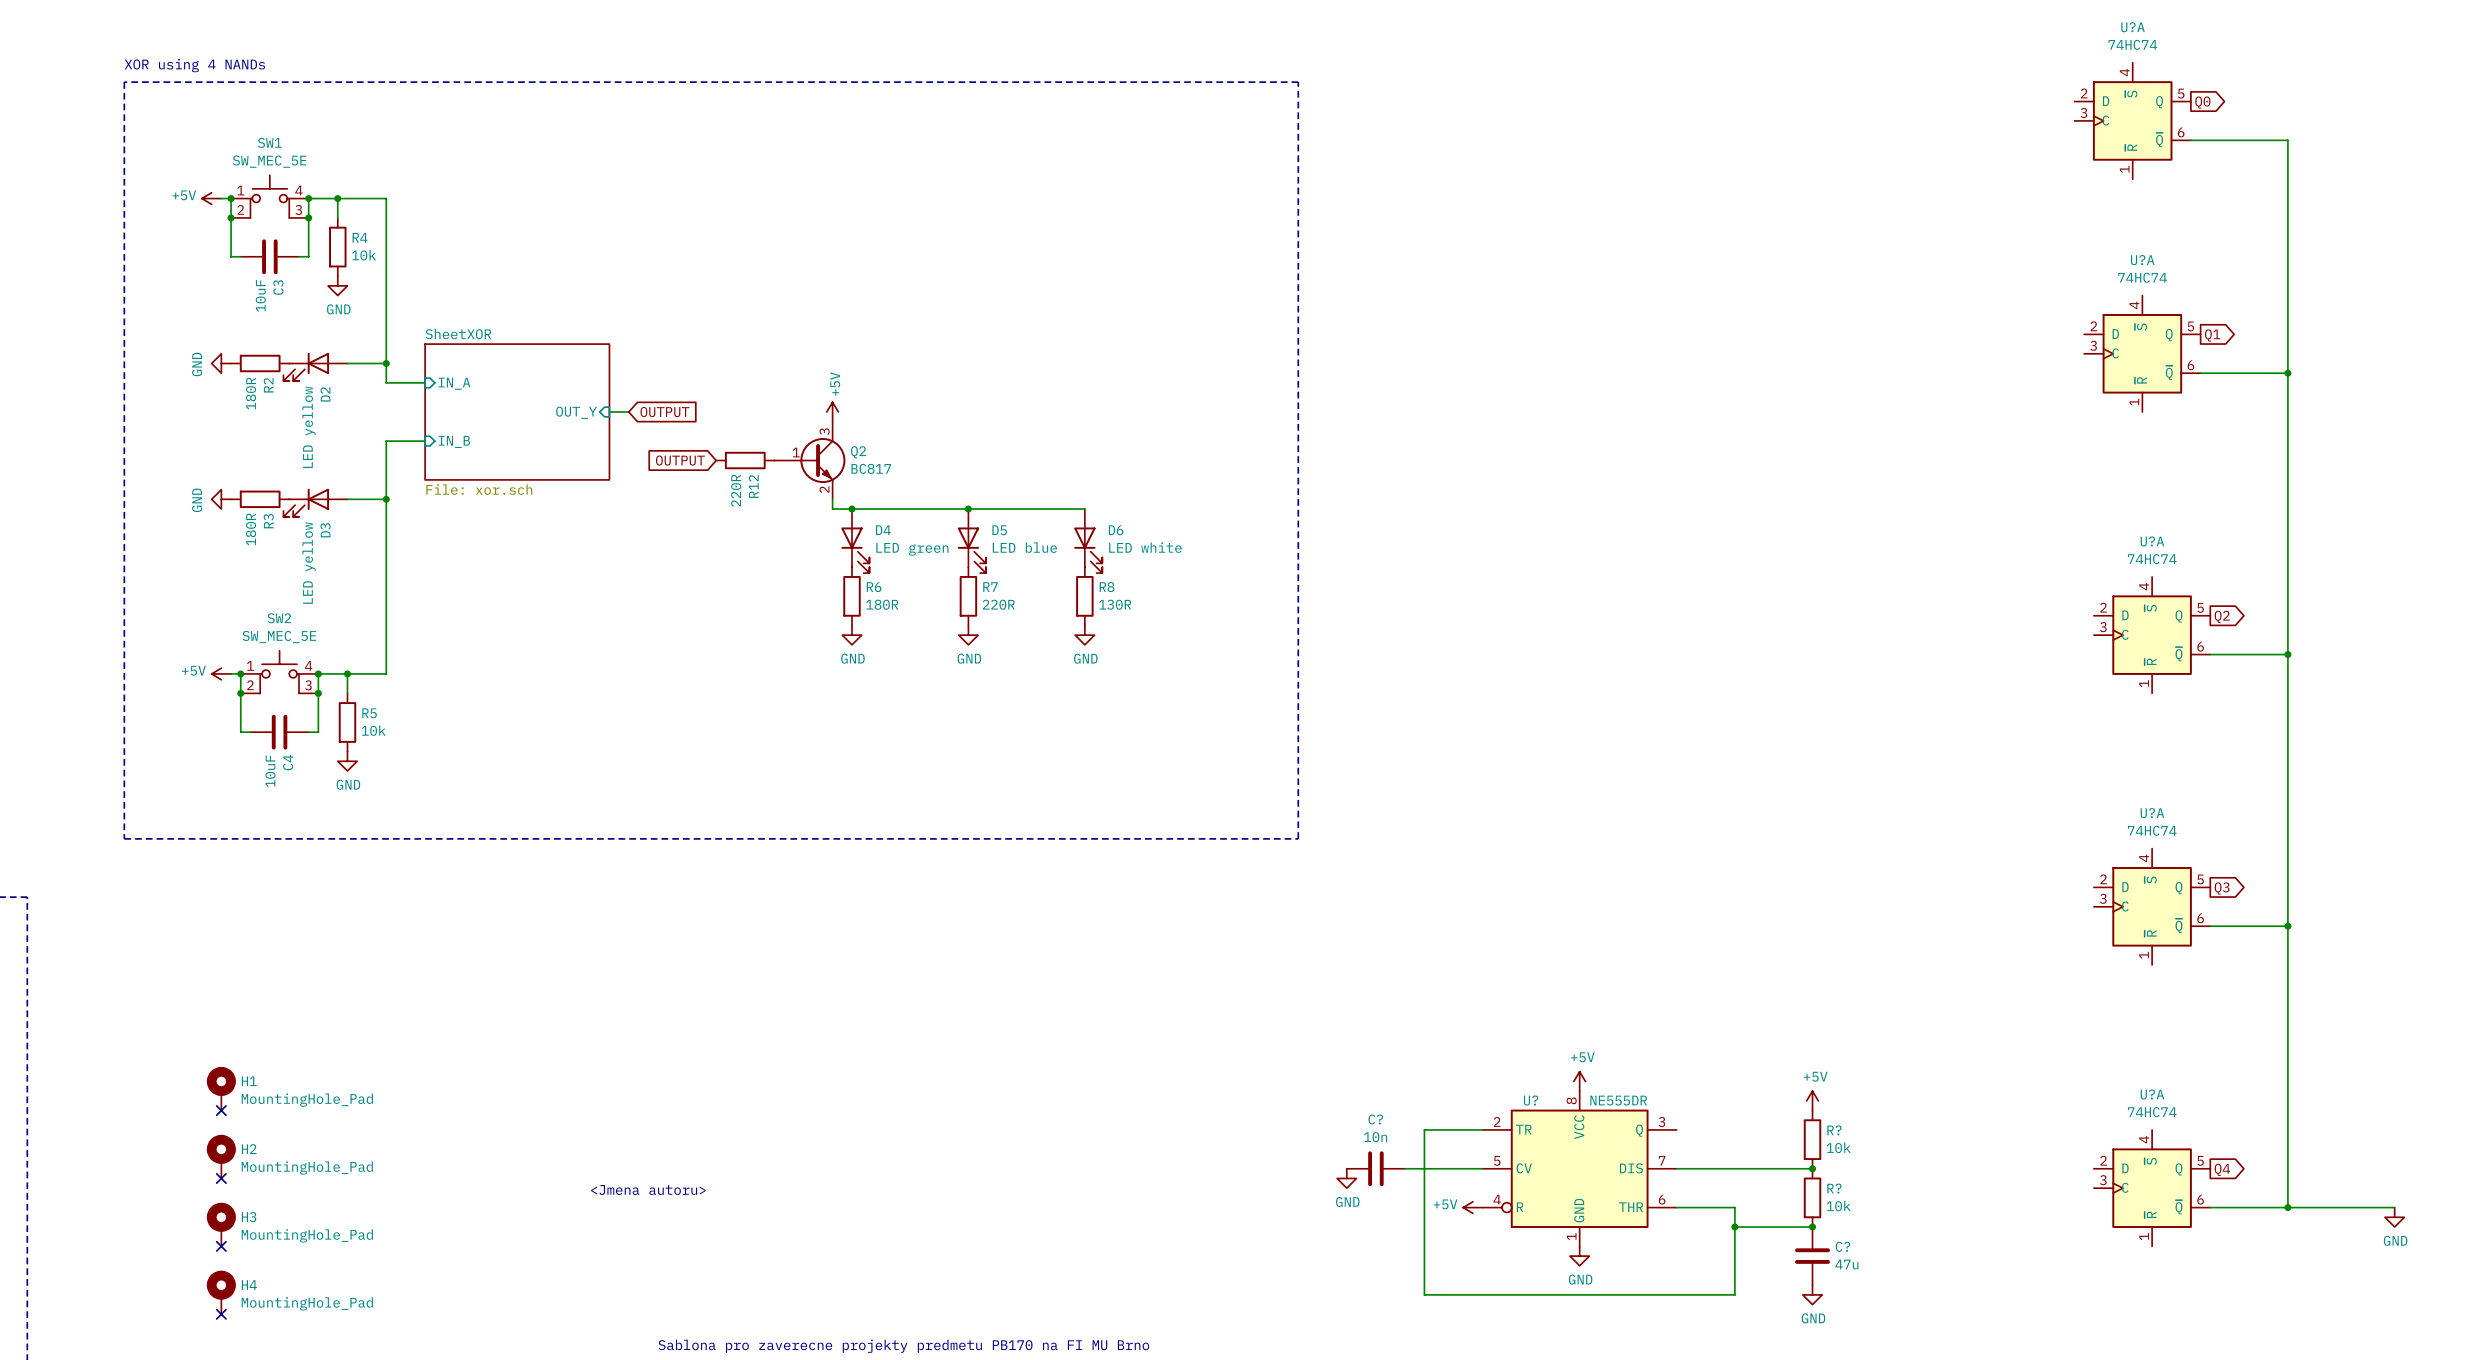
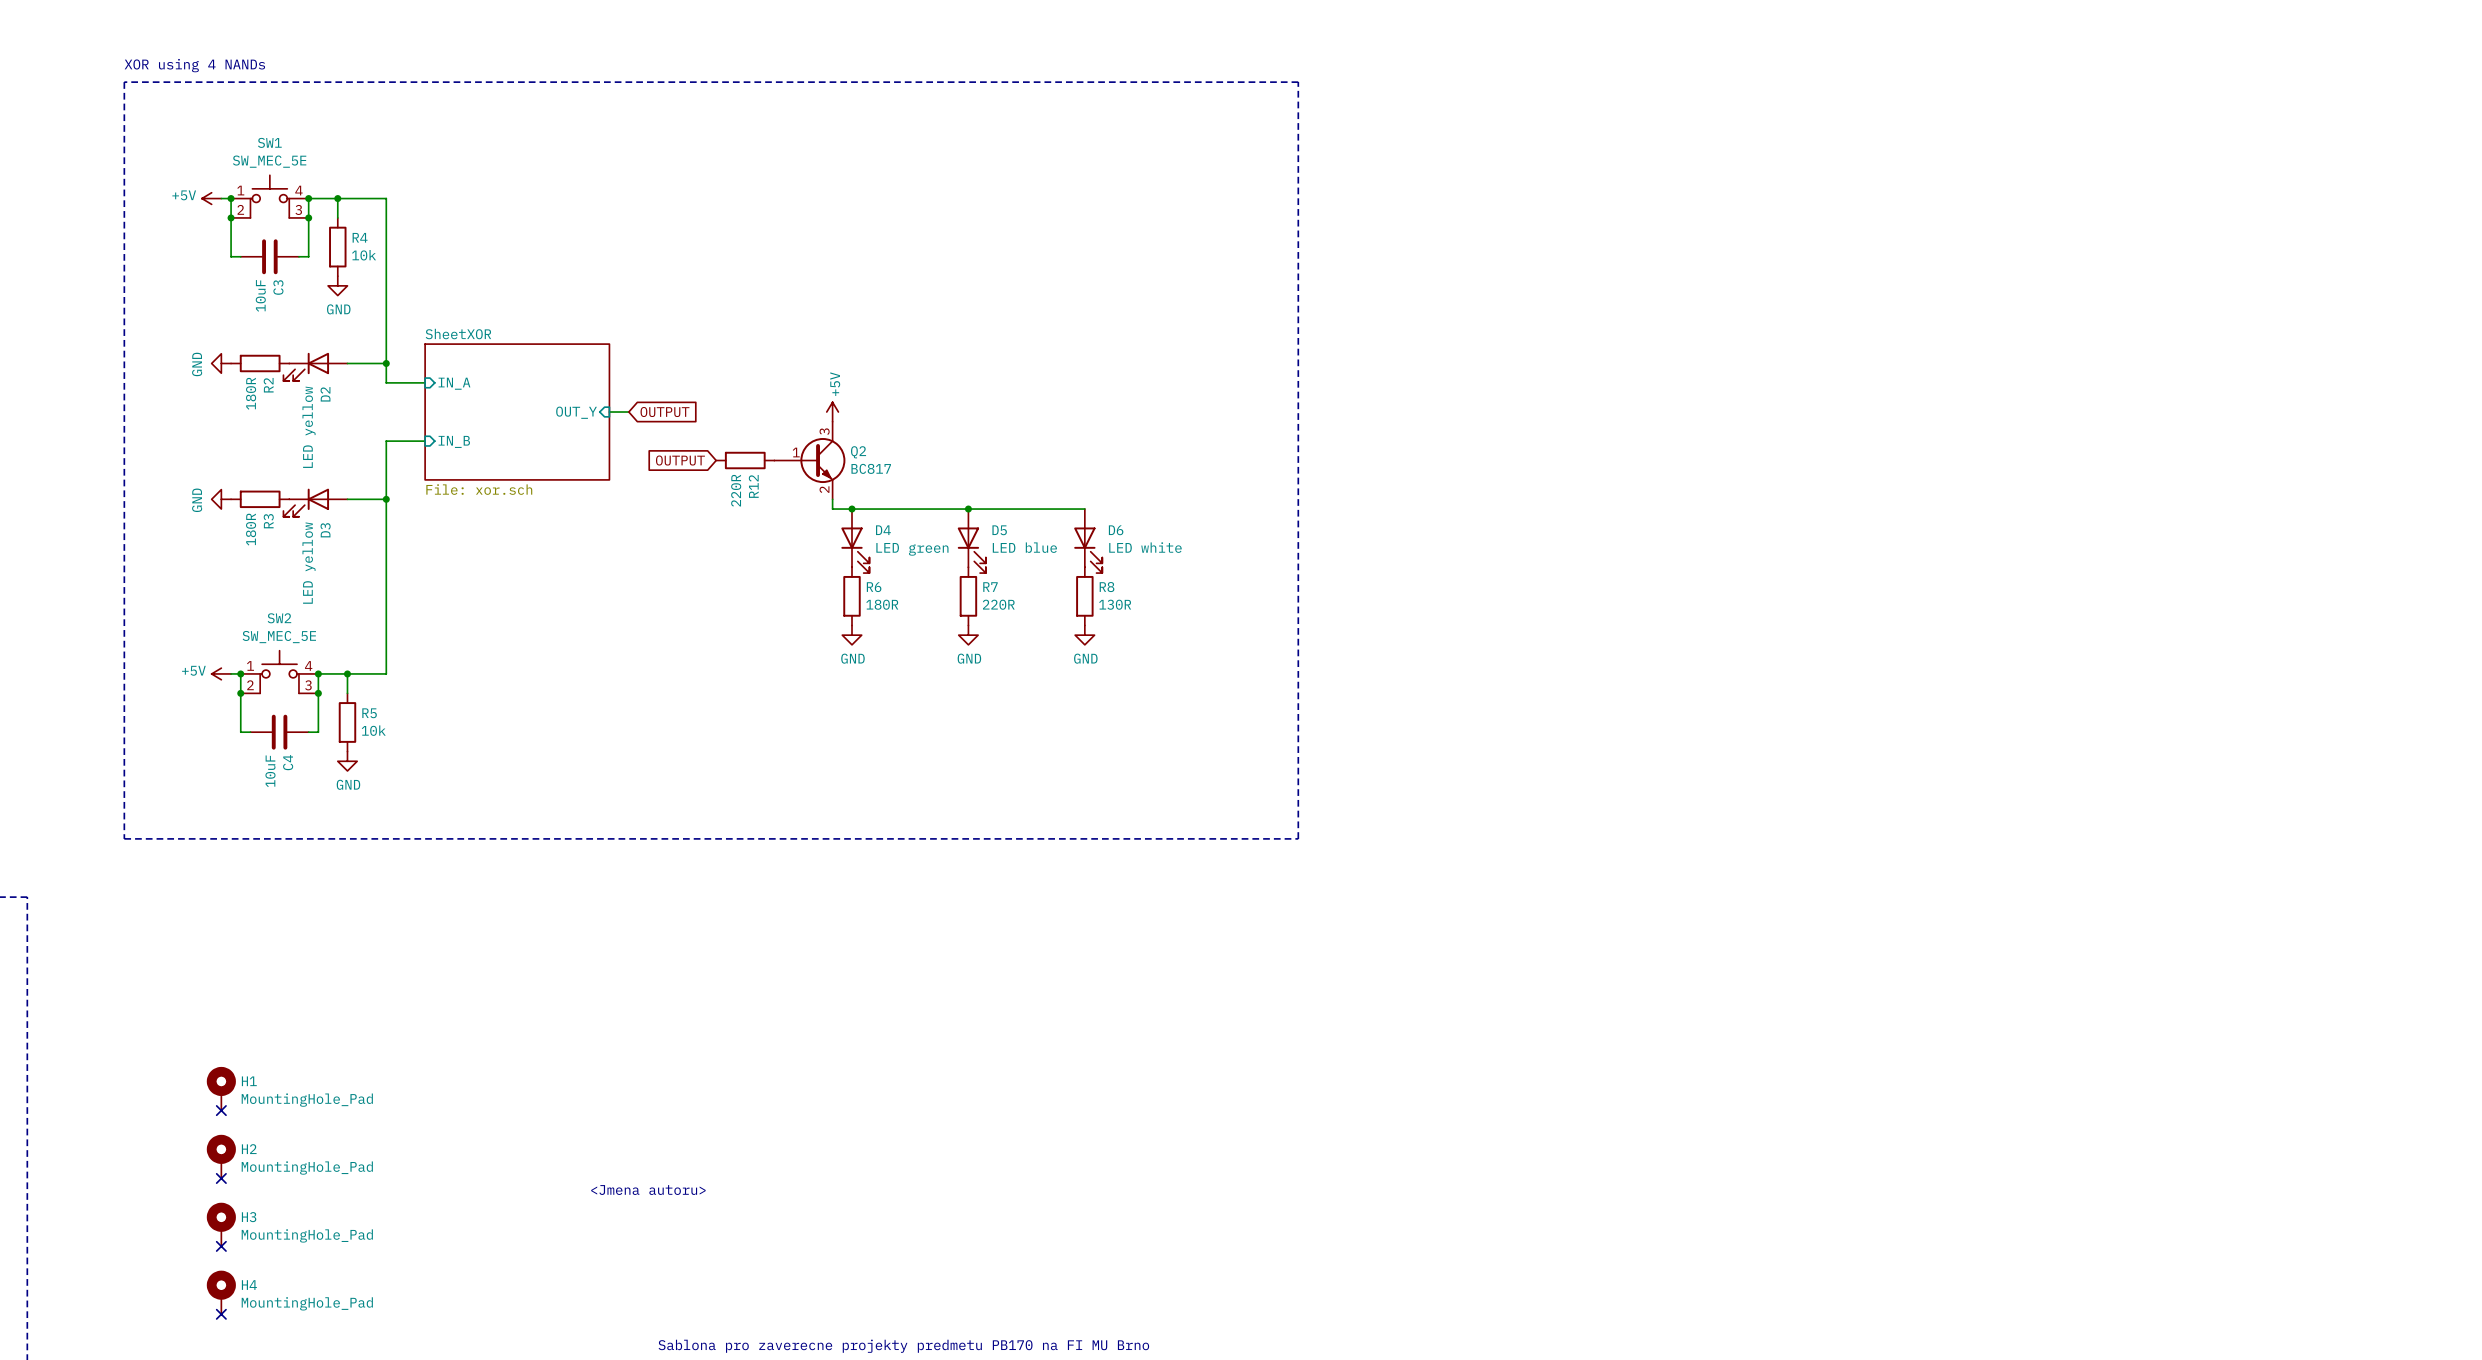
global label: Q0 (2202, 102) -> none
U?A: 74HC74 (2132, 120) -> none
wire: (2190, 140) (2287, 140) (2287, 1207) -> none
global label: Q1 (2212, 335) -> none
U?A: 74HC74 (2142, 353) -> none
wire: (2200, 373) (2287, 373) -> none
junction: (2287, 373) -> none
global label: Q2 (2222, 616) -> none
U?A: 74HC74 (2152, 635) -> none
wire: (2210, 654) (2287, 654) -> none
junction: (2287, 654) -> none
global label: Q3 (2222, 888) -> none
U?A: 74HC74 (2152, 906) -> none
wire: (2210, 926) (2287, 926) -> none
junction: (2287, 926) -> none
power symbol: +5V (1579, 1081) -> none
power symbol: +5V (1812, 1100) -> none
wire: (1482, 1129) (1424, 1129) (1424, 1294) (1734, 1294) (1734, 1207) (1676, 1207) -> none
R?: 10k (1812, 1139) -> none
C?: 10n (1375, 1168) -> none
wire: (1405, 1168) (1482, 1168) -> none
U?: NE555DR (1579, 1168) -> none
wire: (1676, 1168) (1812, 1168) -> none
junction: (1812, 1168) -> none
global label: Q4 (2222, 1169) -> none
power symbol: GND (1346, 1178) -> none
U?A: 74HC74 (2152, 1188) -> none
R?: 10k (1812, 1197) -> none
power symbol: +5V (1472, 1207) -> none
wire: (2210, 1207) (2394, 1207) -> none
junction: (2287, 1207) -> none
power symbol: GND (2394, 1217) -> none
wire: (1734, 1226) (1812, 1226) -> none
junction: (1734, 1226) -> none
junction: (1812, 1226) -> none
power symbol: GND (1579, 1256) -> none
C?: 47u (1812, 1256) -> none
power symbol: GND (1812, 1294) -> none

